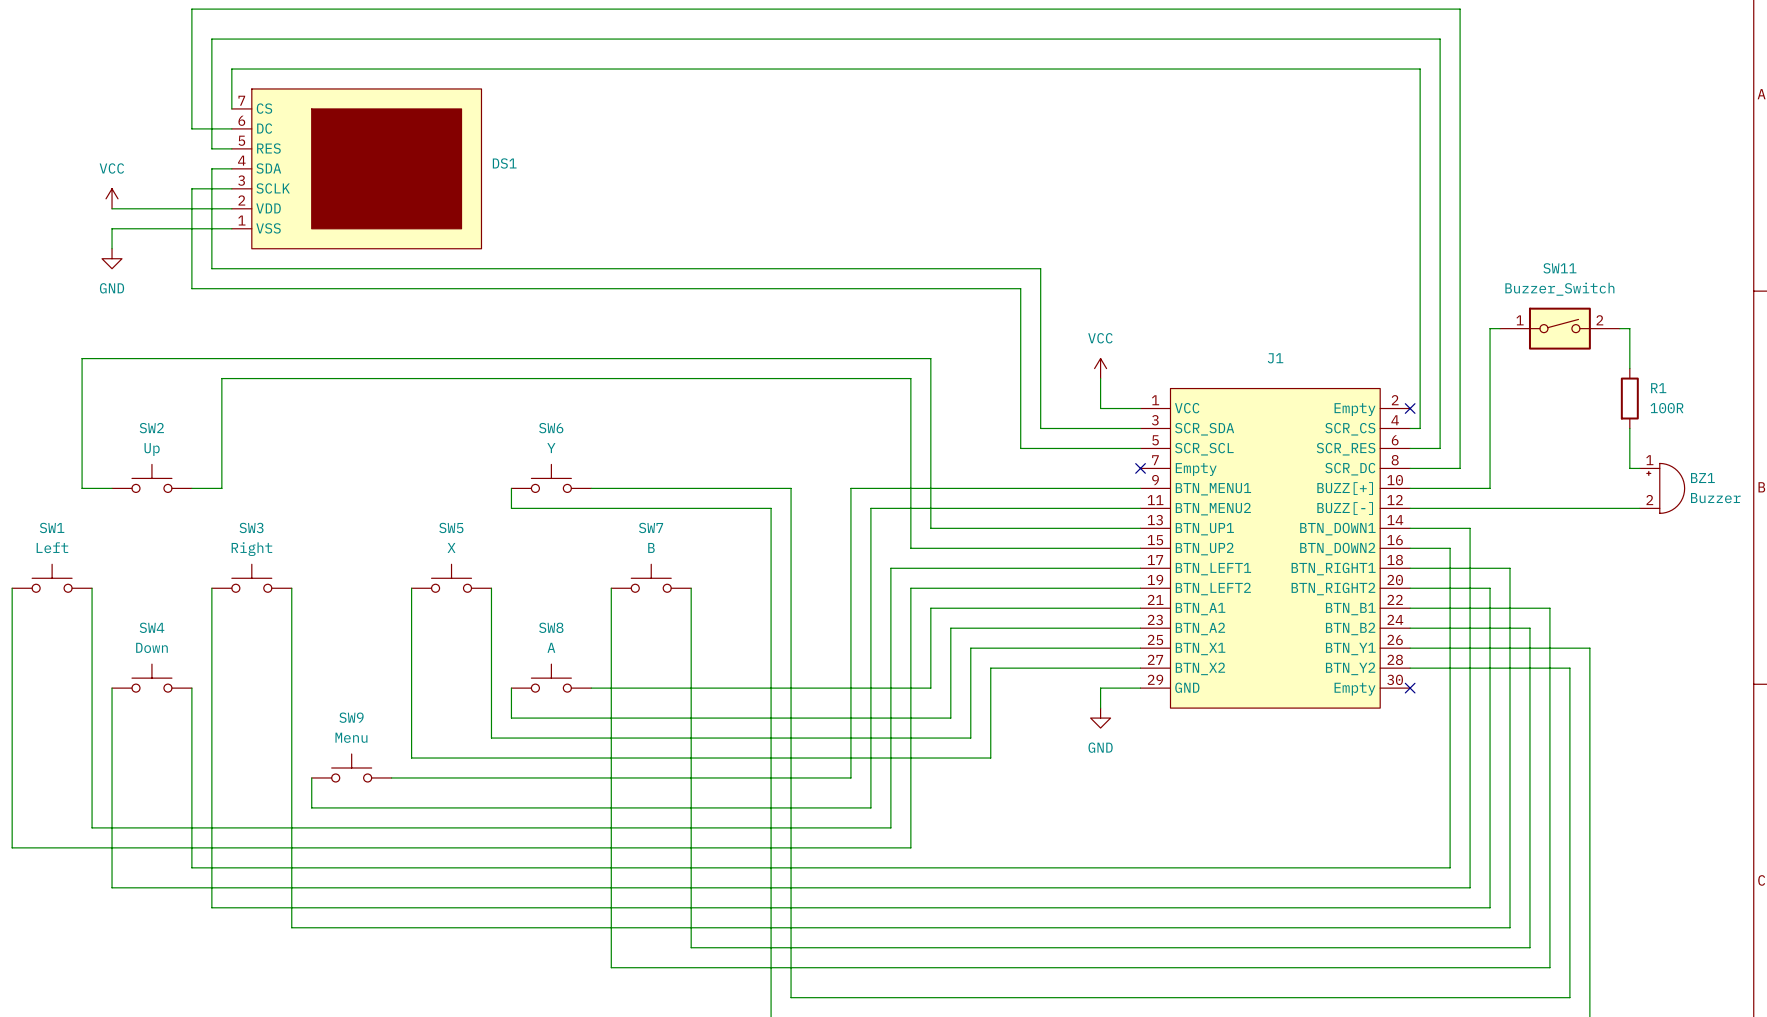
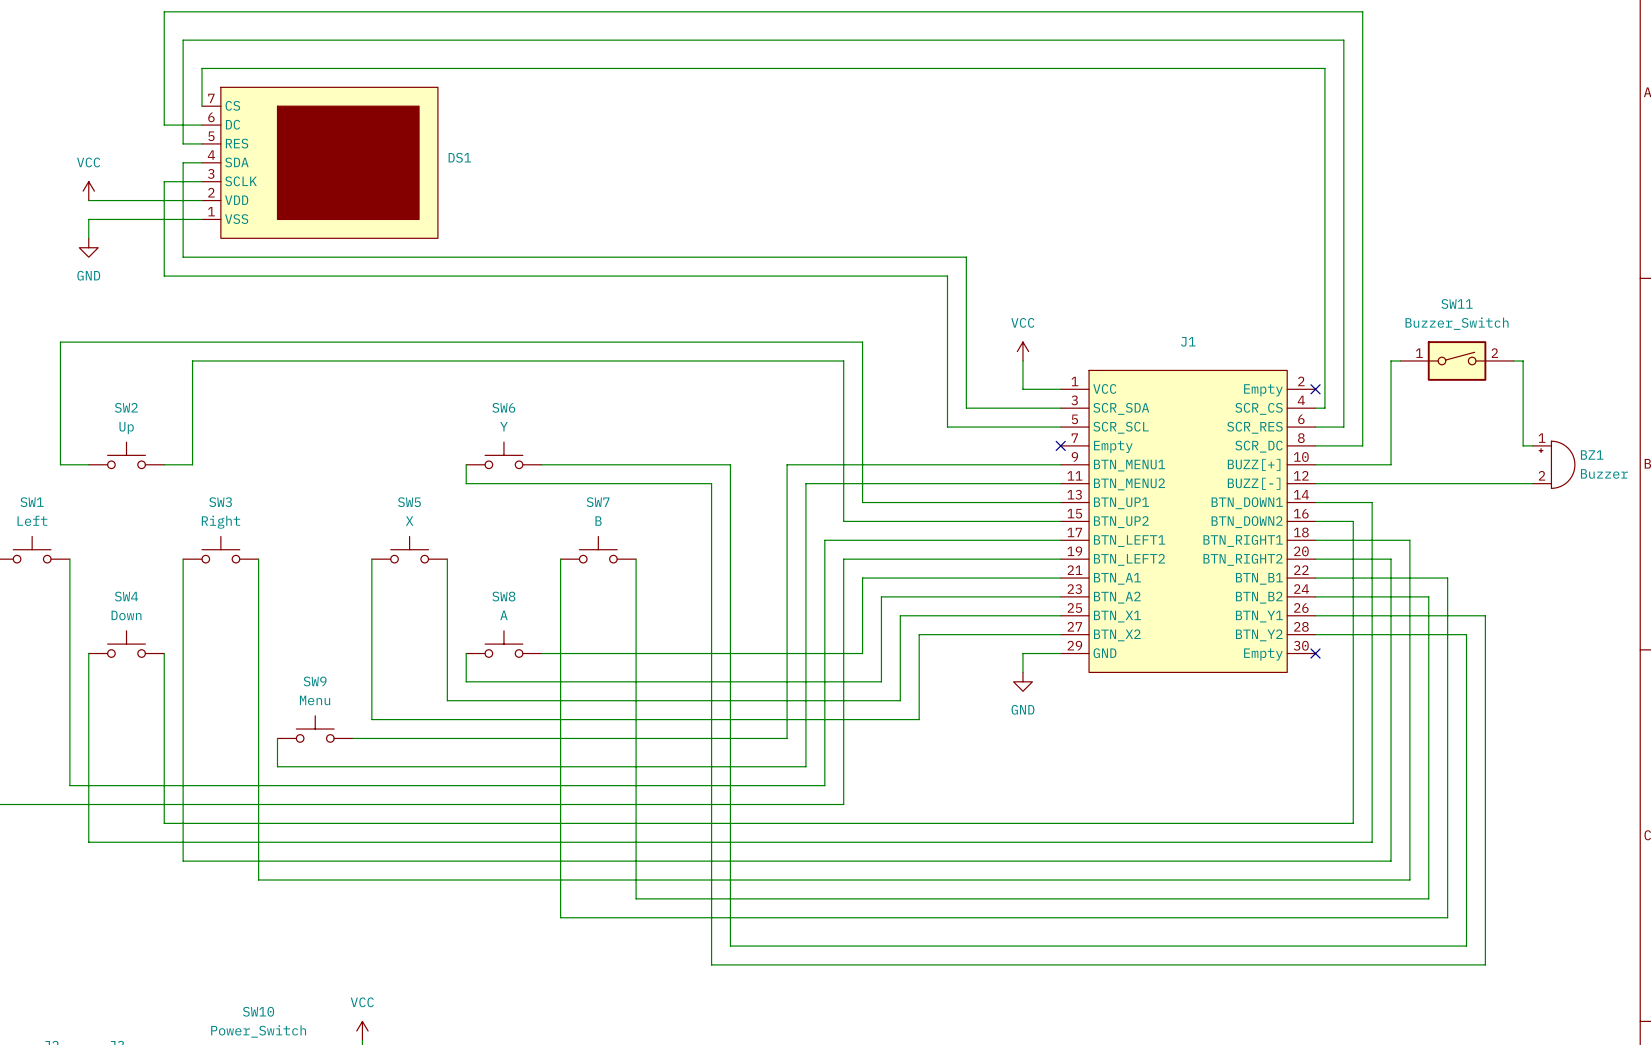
wire: (1500, 328) (1490, 328) (1490, 378) -> (1400, 360) (1391, 360)
SW11 position: (1559, 328) -> (1457, 360)
wire: (1619, 328) (1629, 328) (1629, 368) -> none
wire: none -> (1513, 360) (1523, 360) (1523, 408)
R1: 100R (1629, 398) -> none

